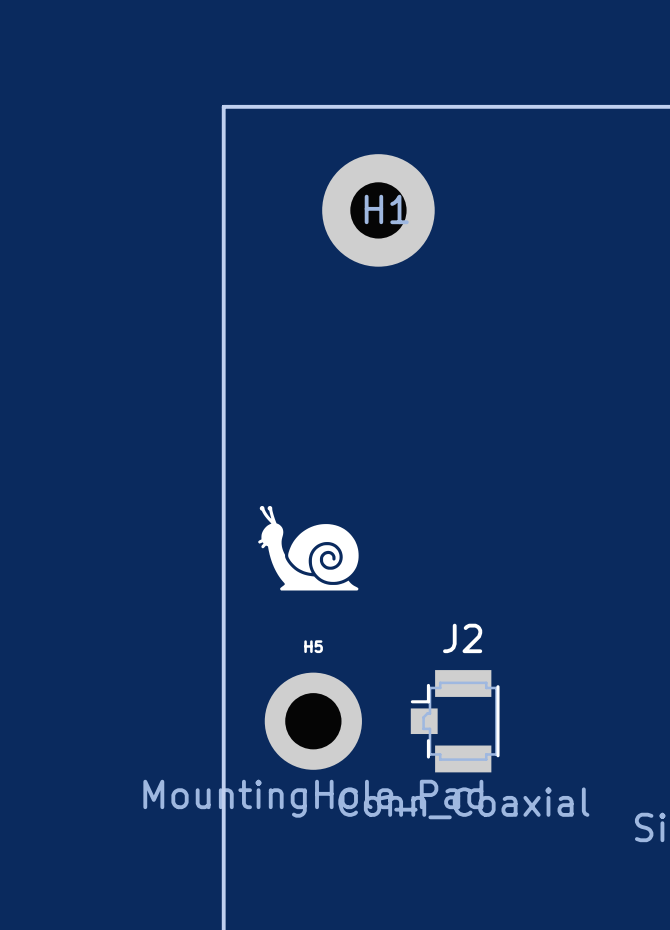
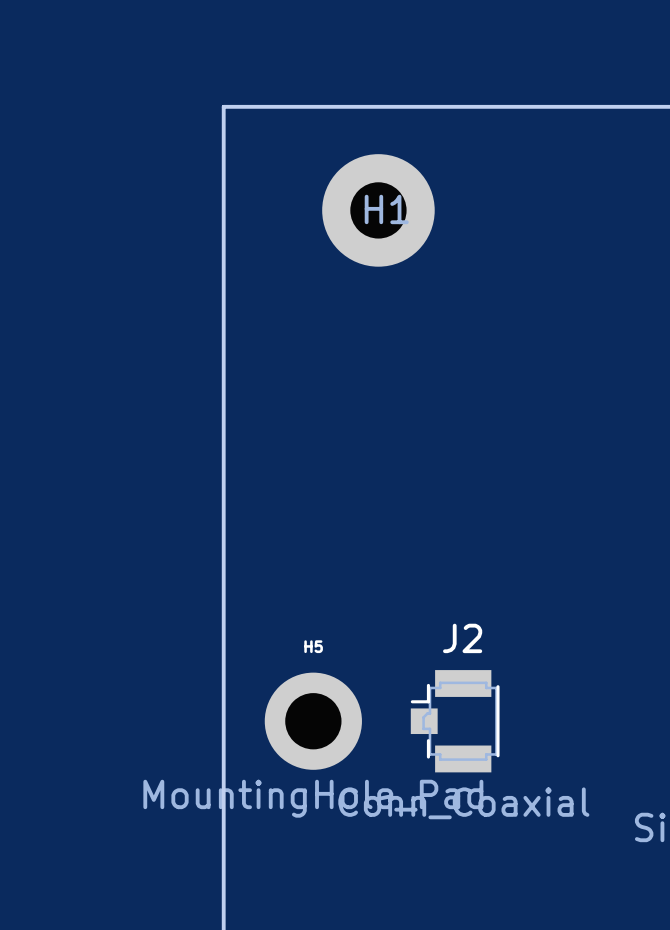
drawing: [258, 505, 359, 591] -> none

